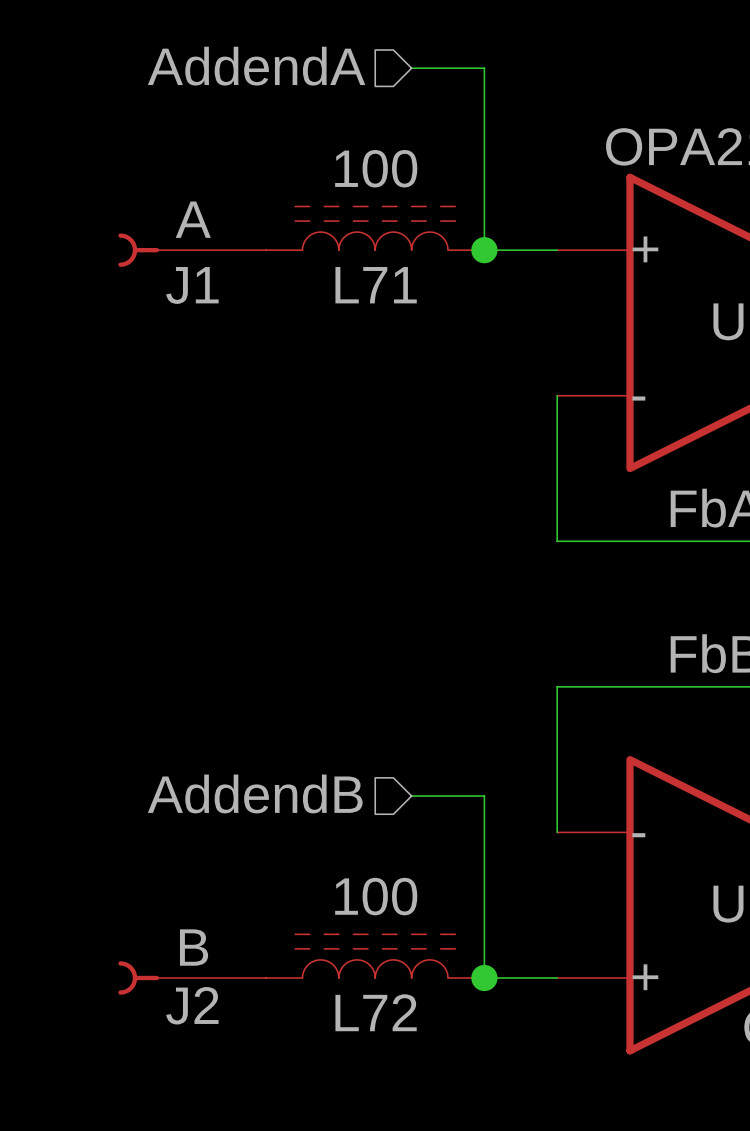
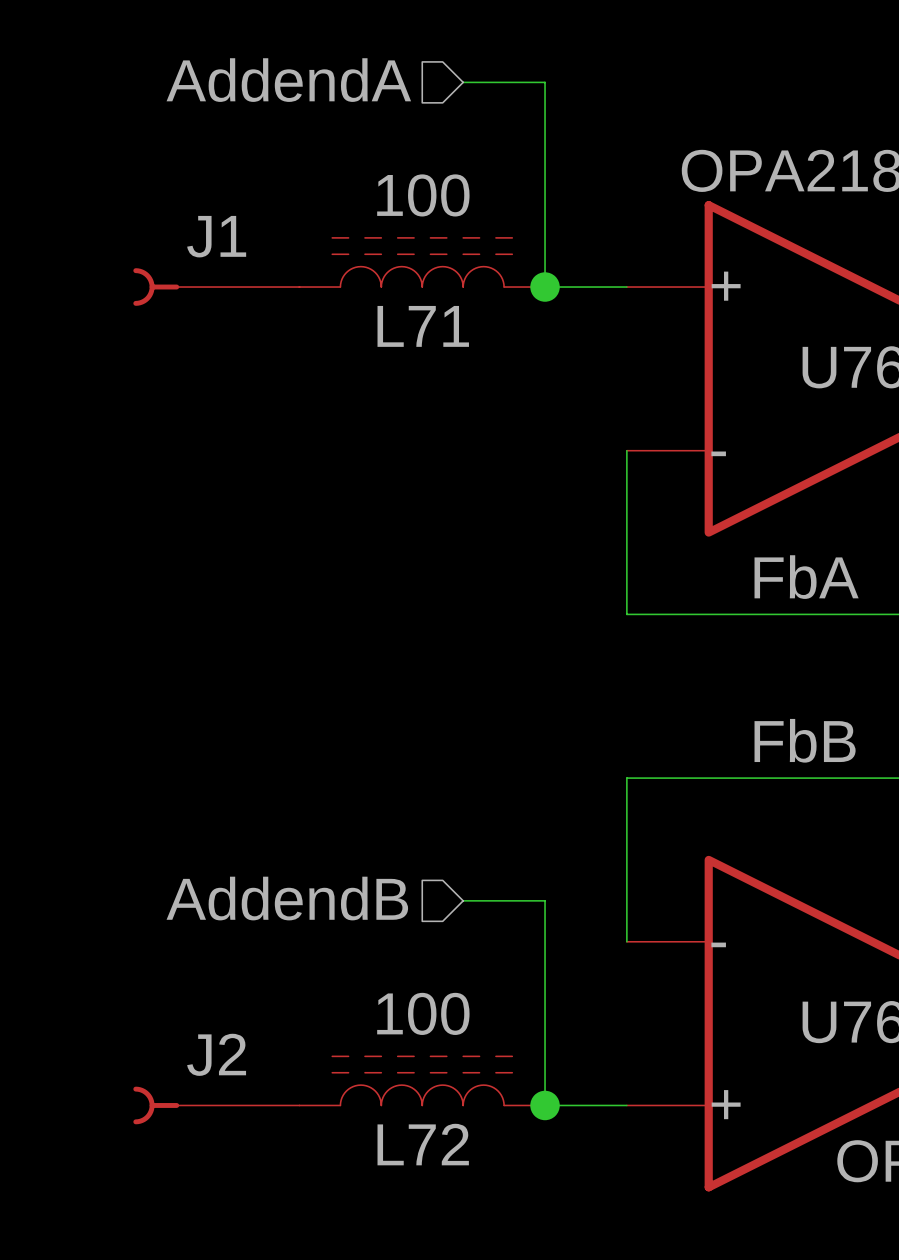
J1 value: A (193, 219) -> none
J1 name position: J1 (192, 285) -> J1 (216, 236)
J2 value: B (194, 947) -> none
J2 name position: J2 (192, 1005) -> J2 (216, 1054)

